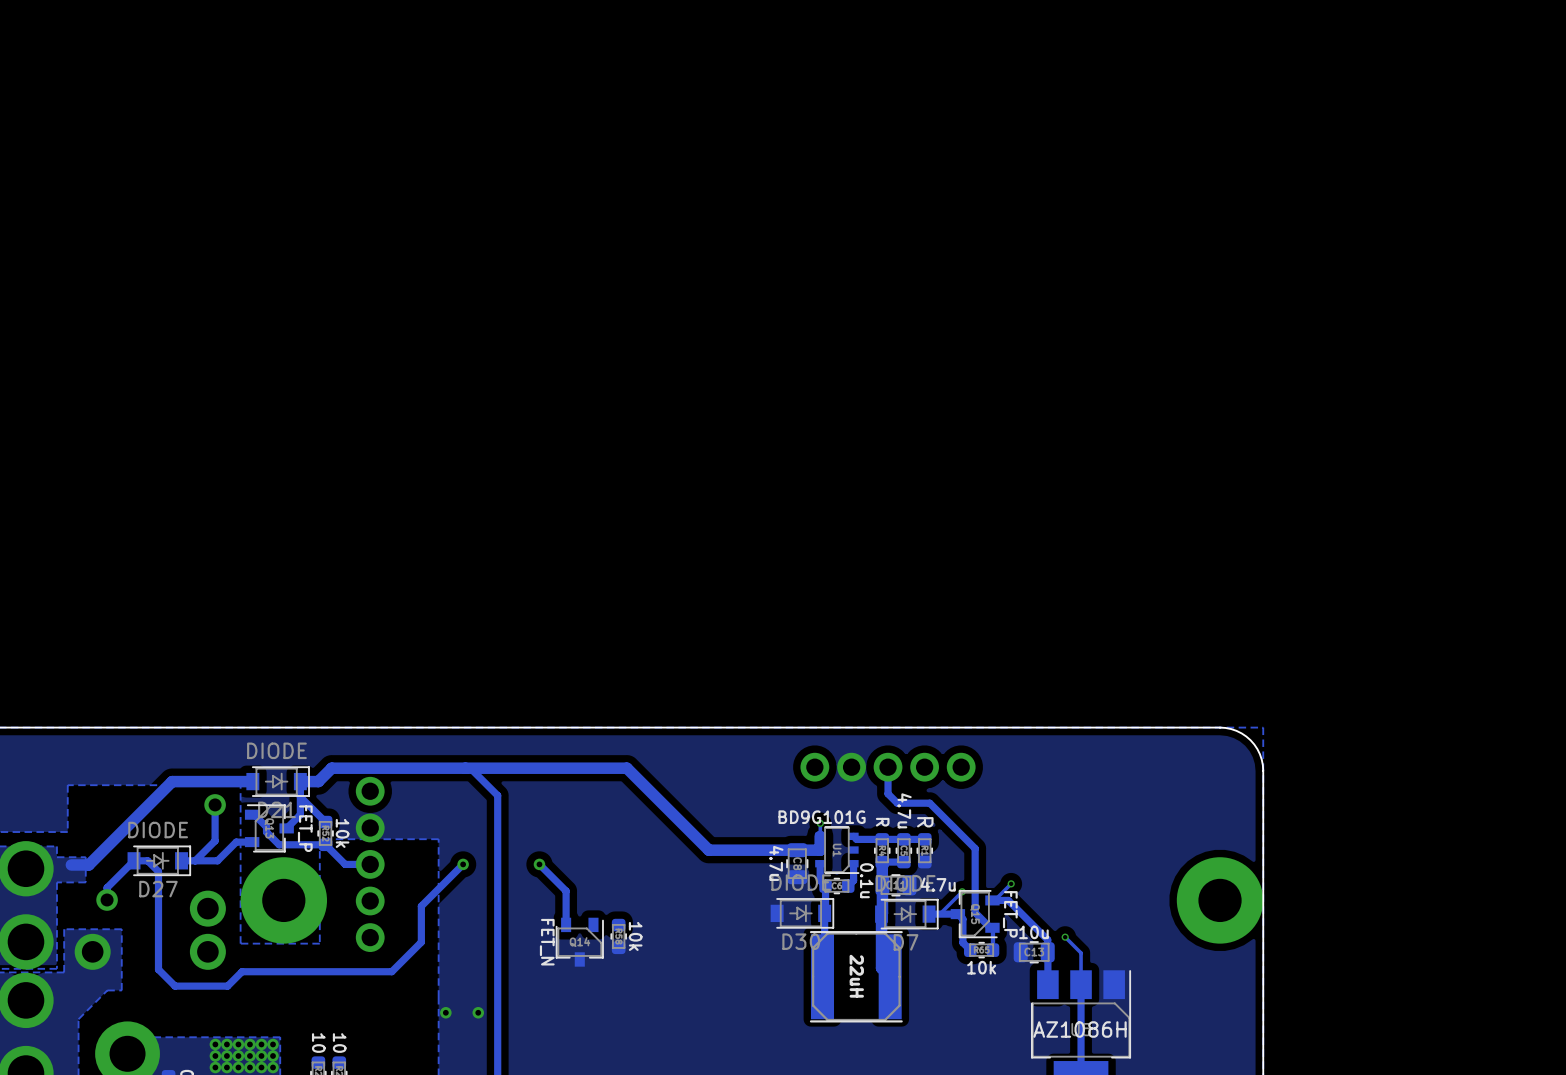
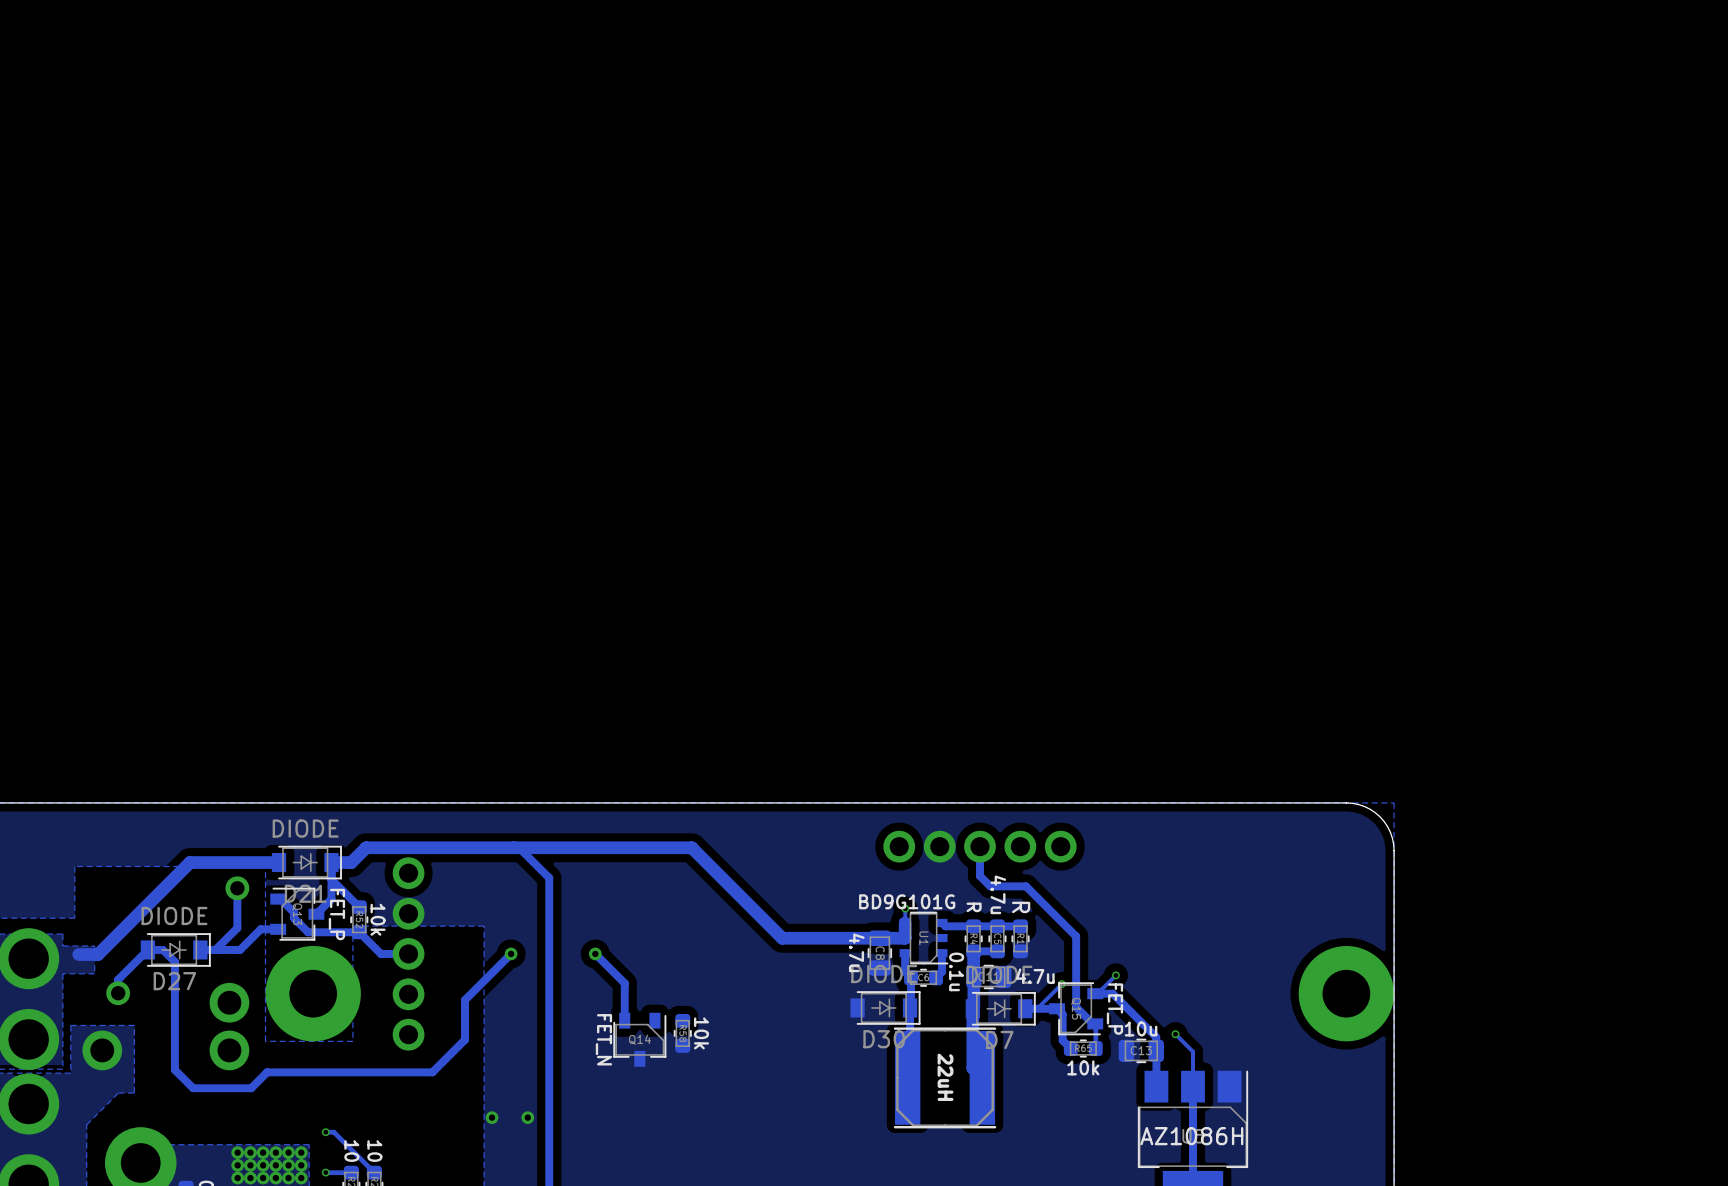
track: none -> (325, 1132) (333, 1132) (374, 1172)
via: none -> (325, 1132)
via: none -> (325, 1172)
track: none -> (351, 1172) (325, 1172)

